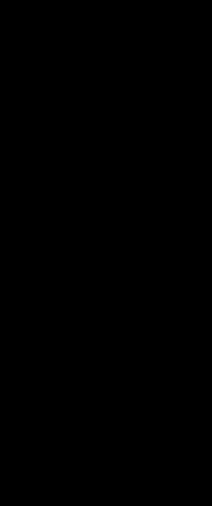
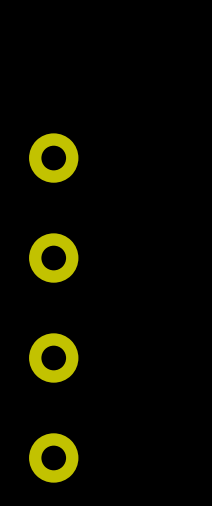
part: none -> (53, 158)
part: none -> (53, 258)
part: none -> (53, 358)
part: none -> (53, 457)

